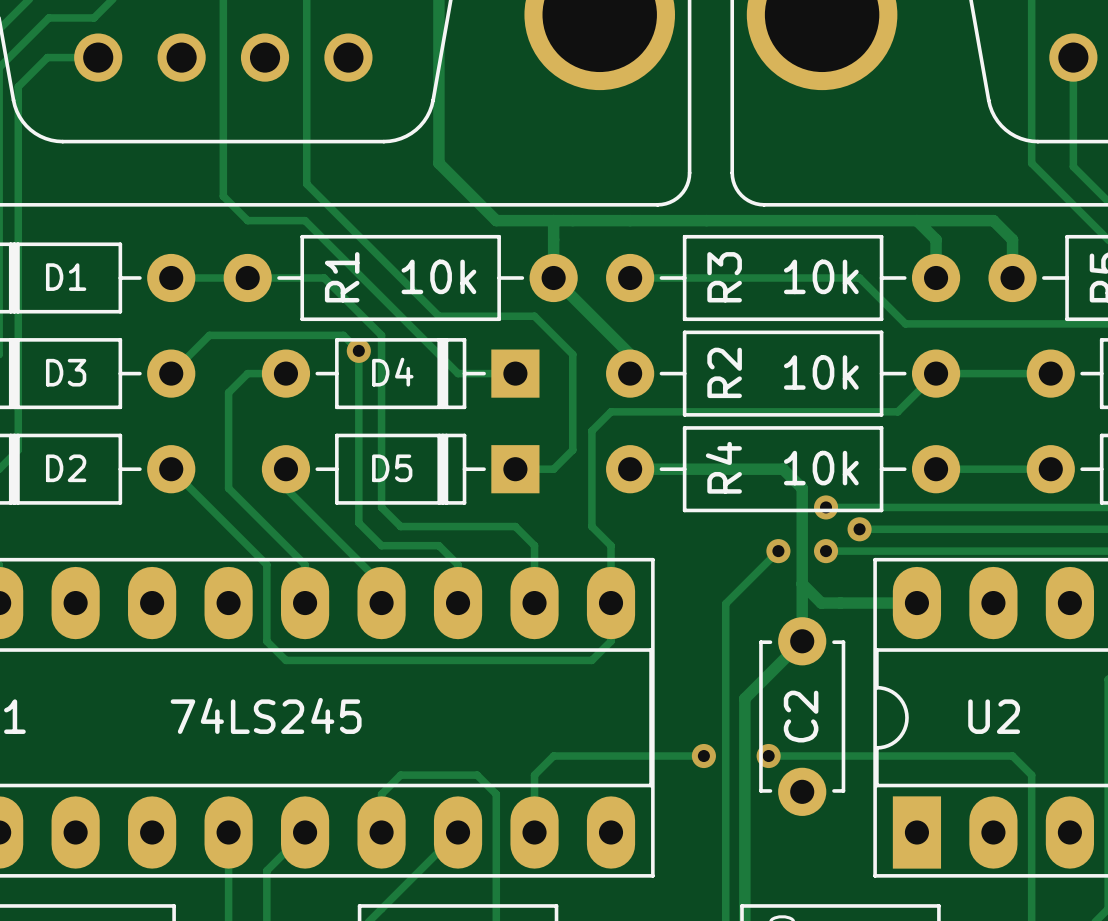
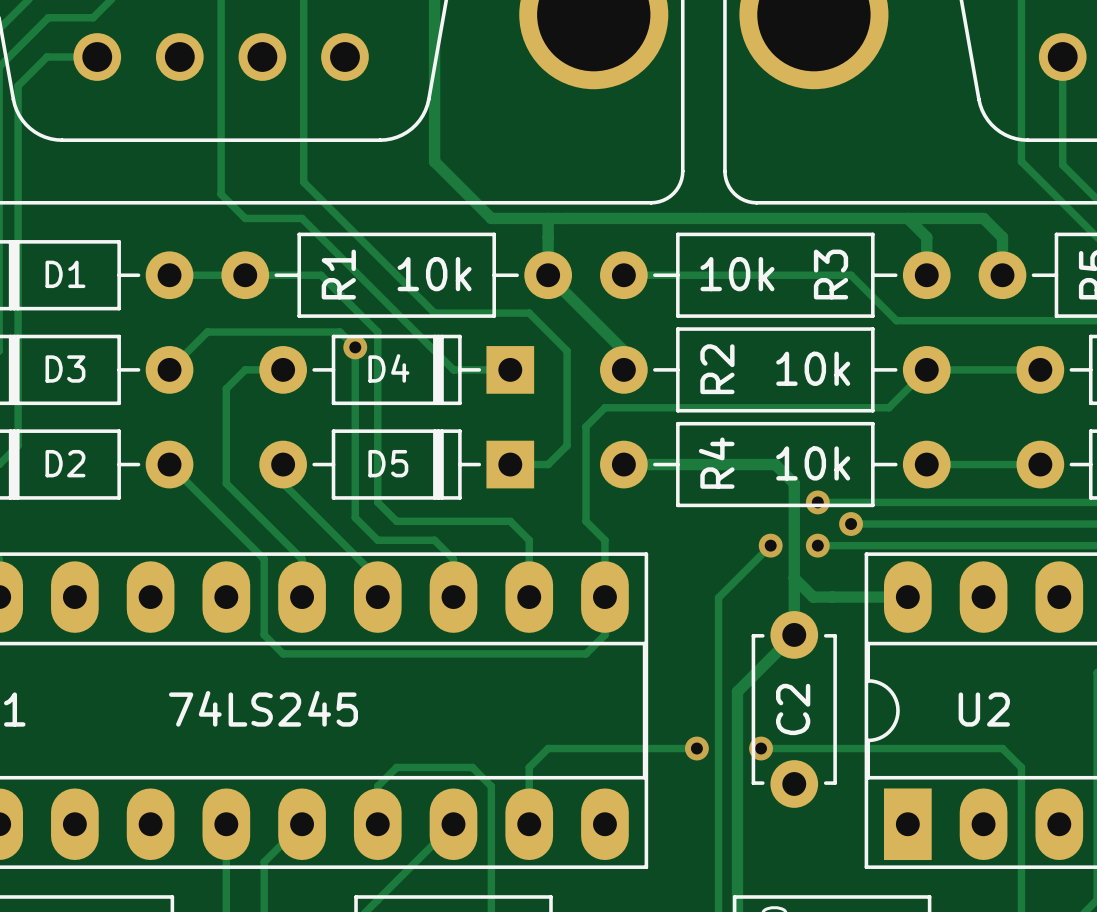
R3 value position: 10k (821, 276) -> 10k (737, 274)
R3 name position: R3 (724, 277) -> R3 (831, 274)

